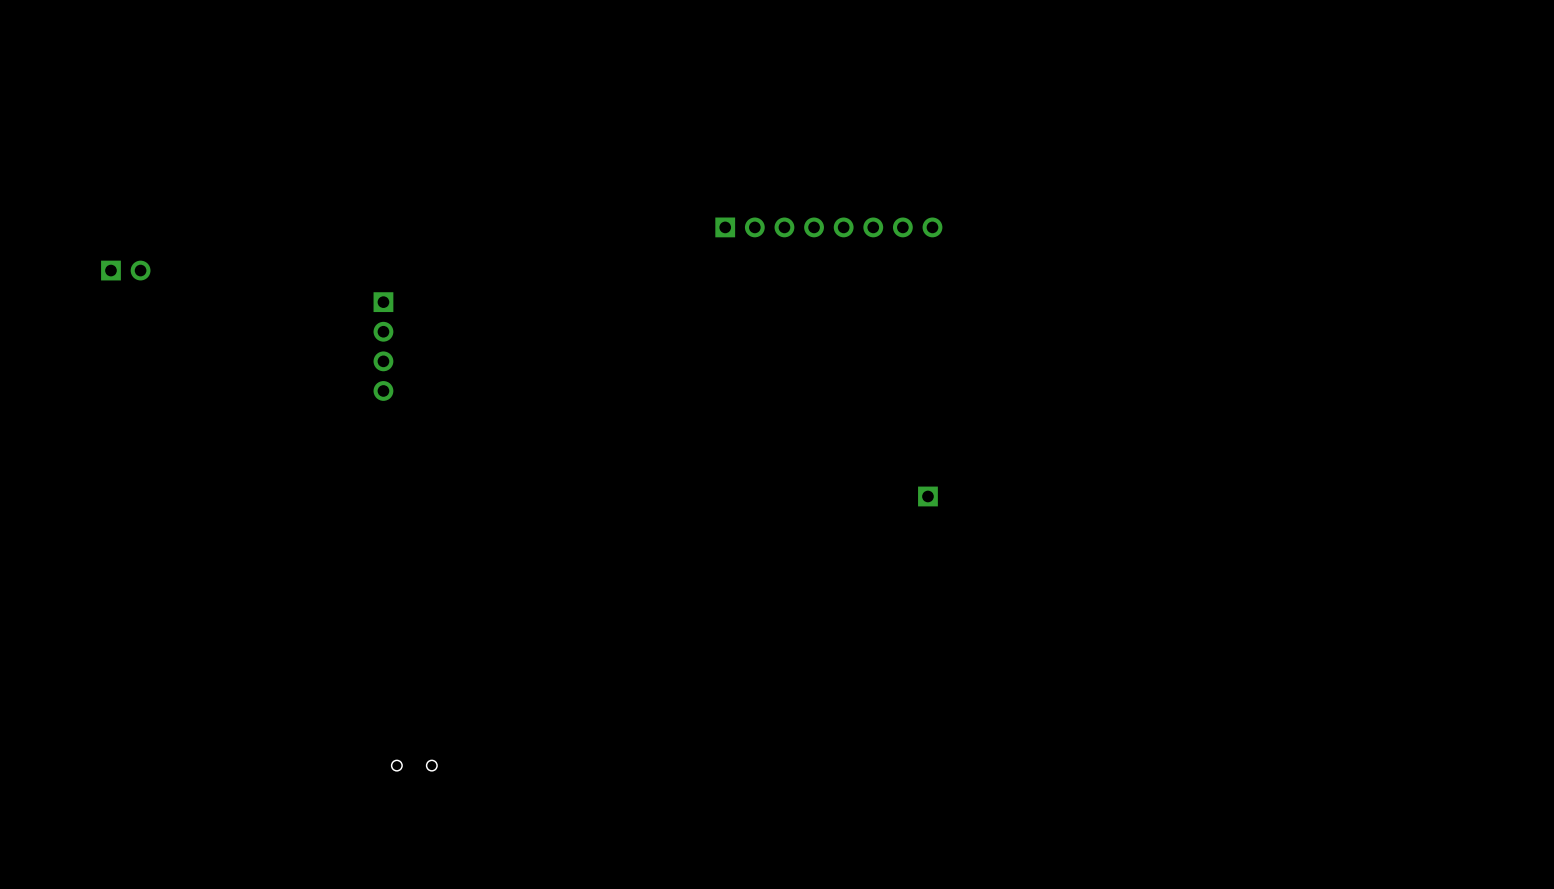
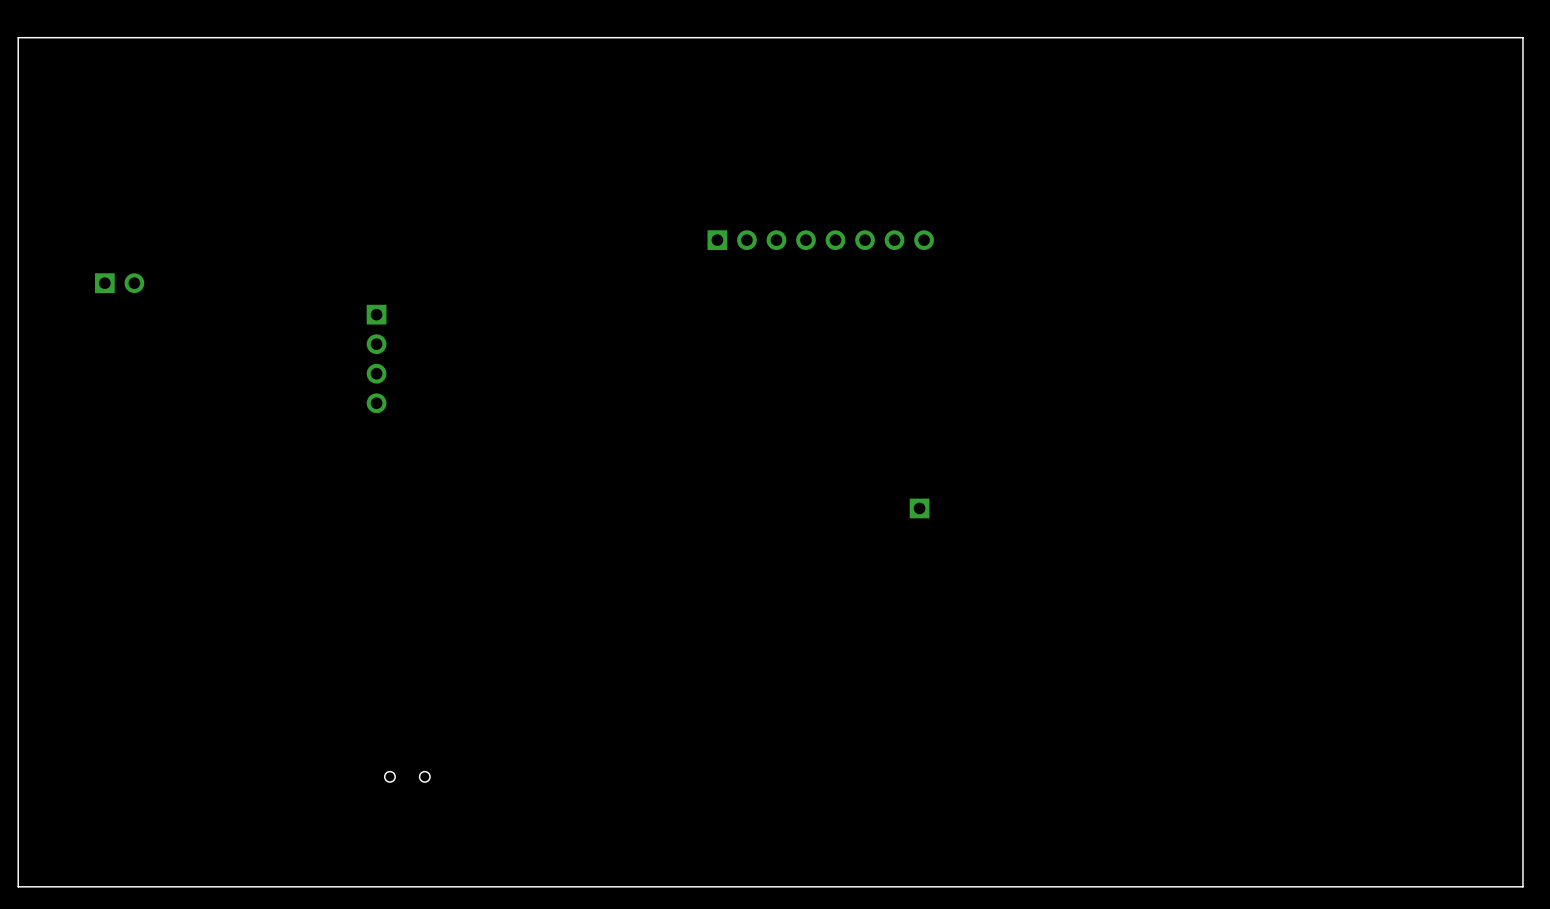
board edge: none -> (1522, 37) (18, 37) (18, 886) (1522, 886) (1522, 37)

